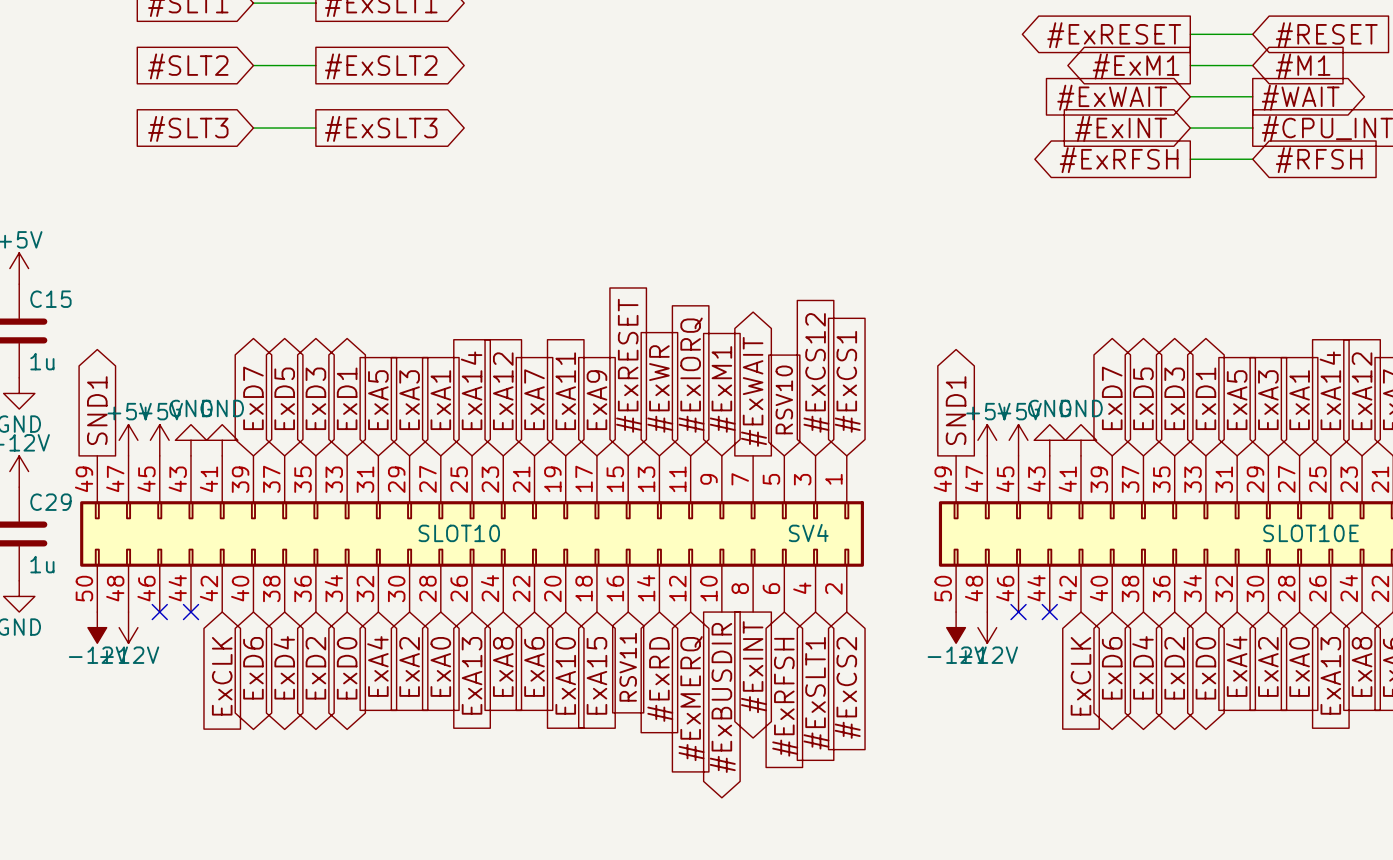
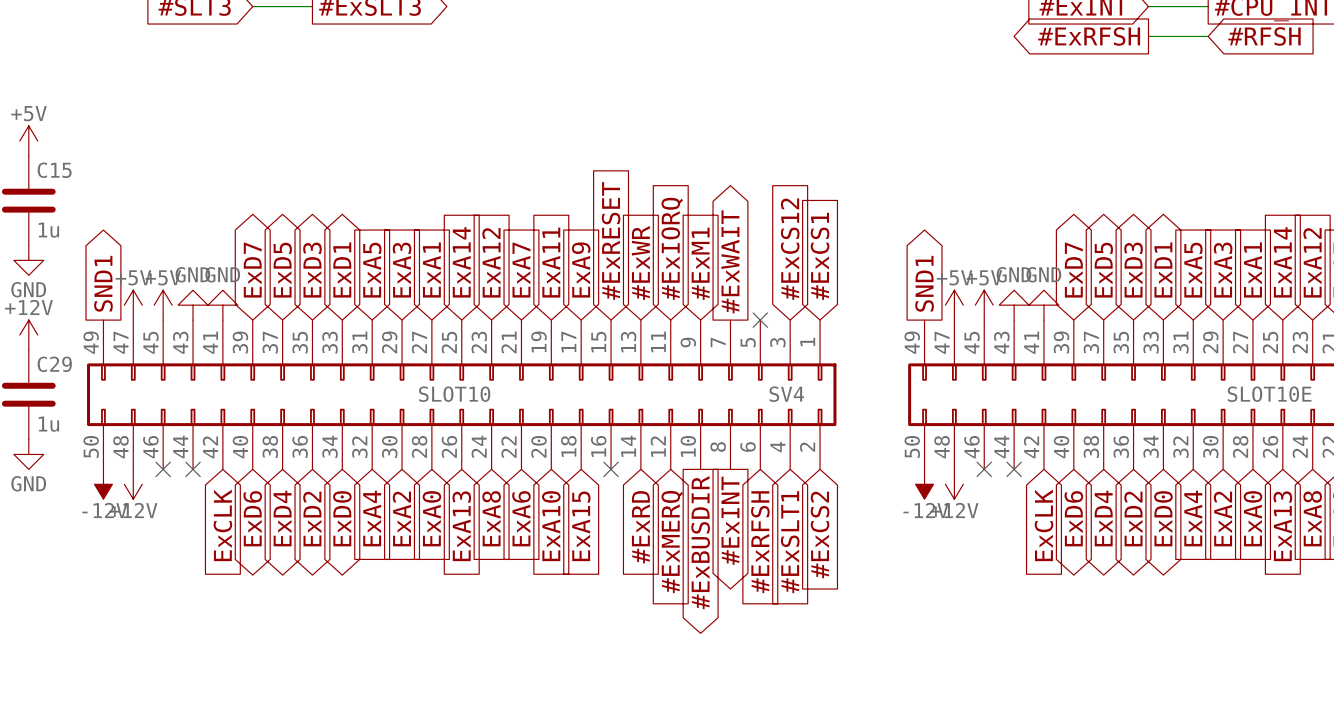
global label: RSV10 (784, 399) -> none
no-connect mark: none -> (760, 320)
no-connect mark: none -> (611, 469)
global label: RSV11 (628, 667) -> none

